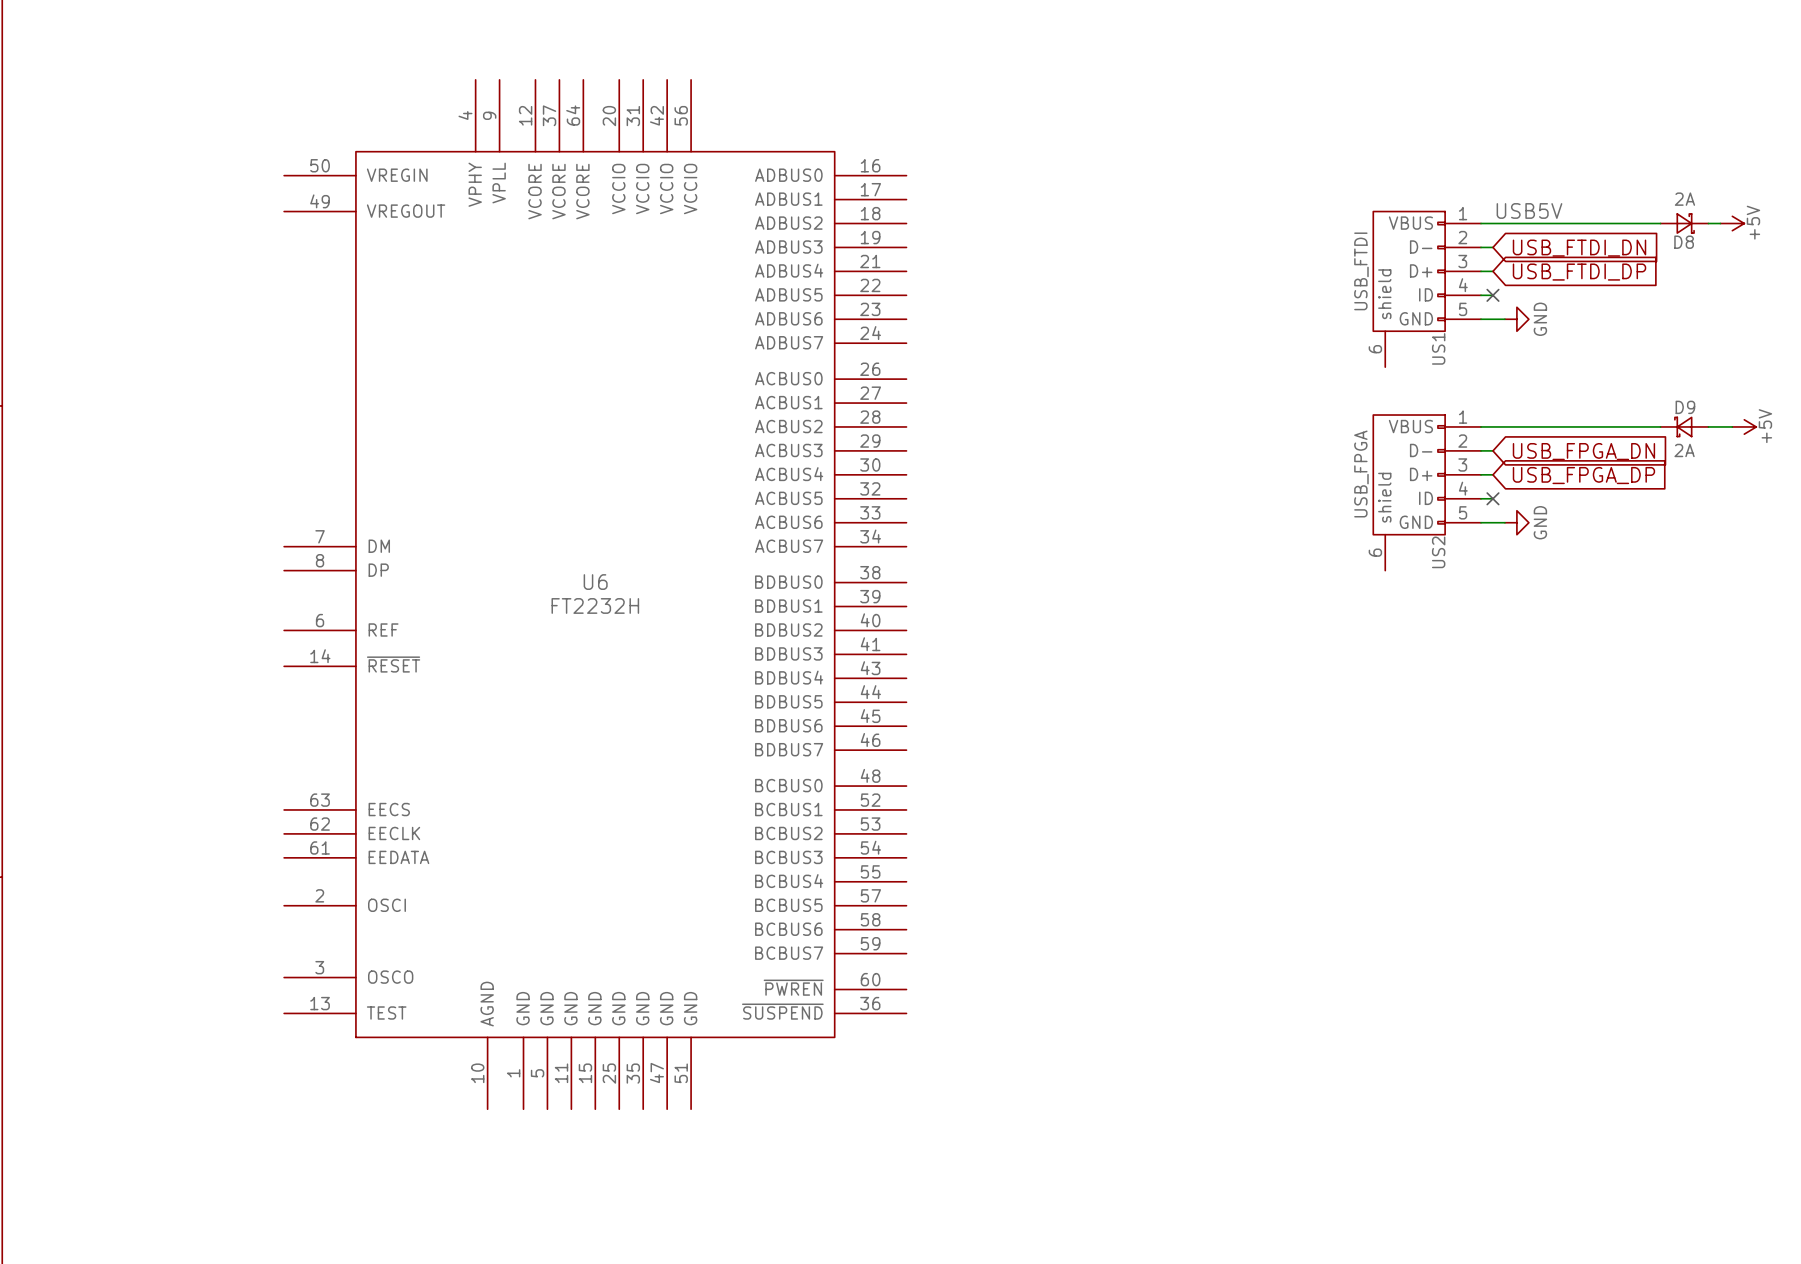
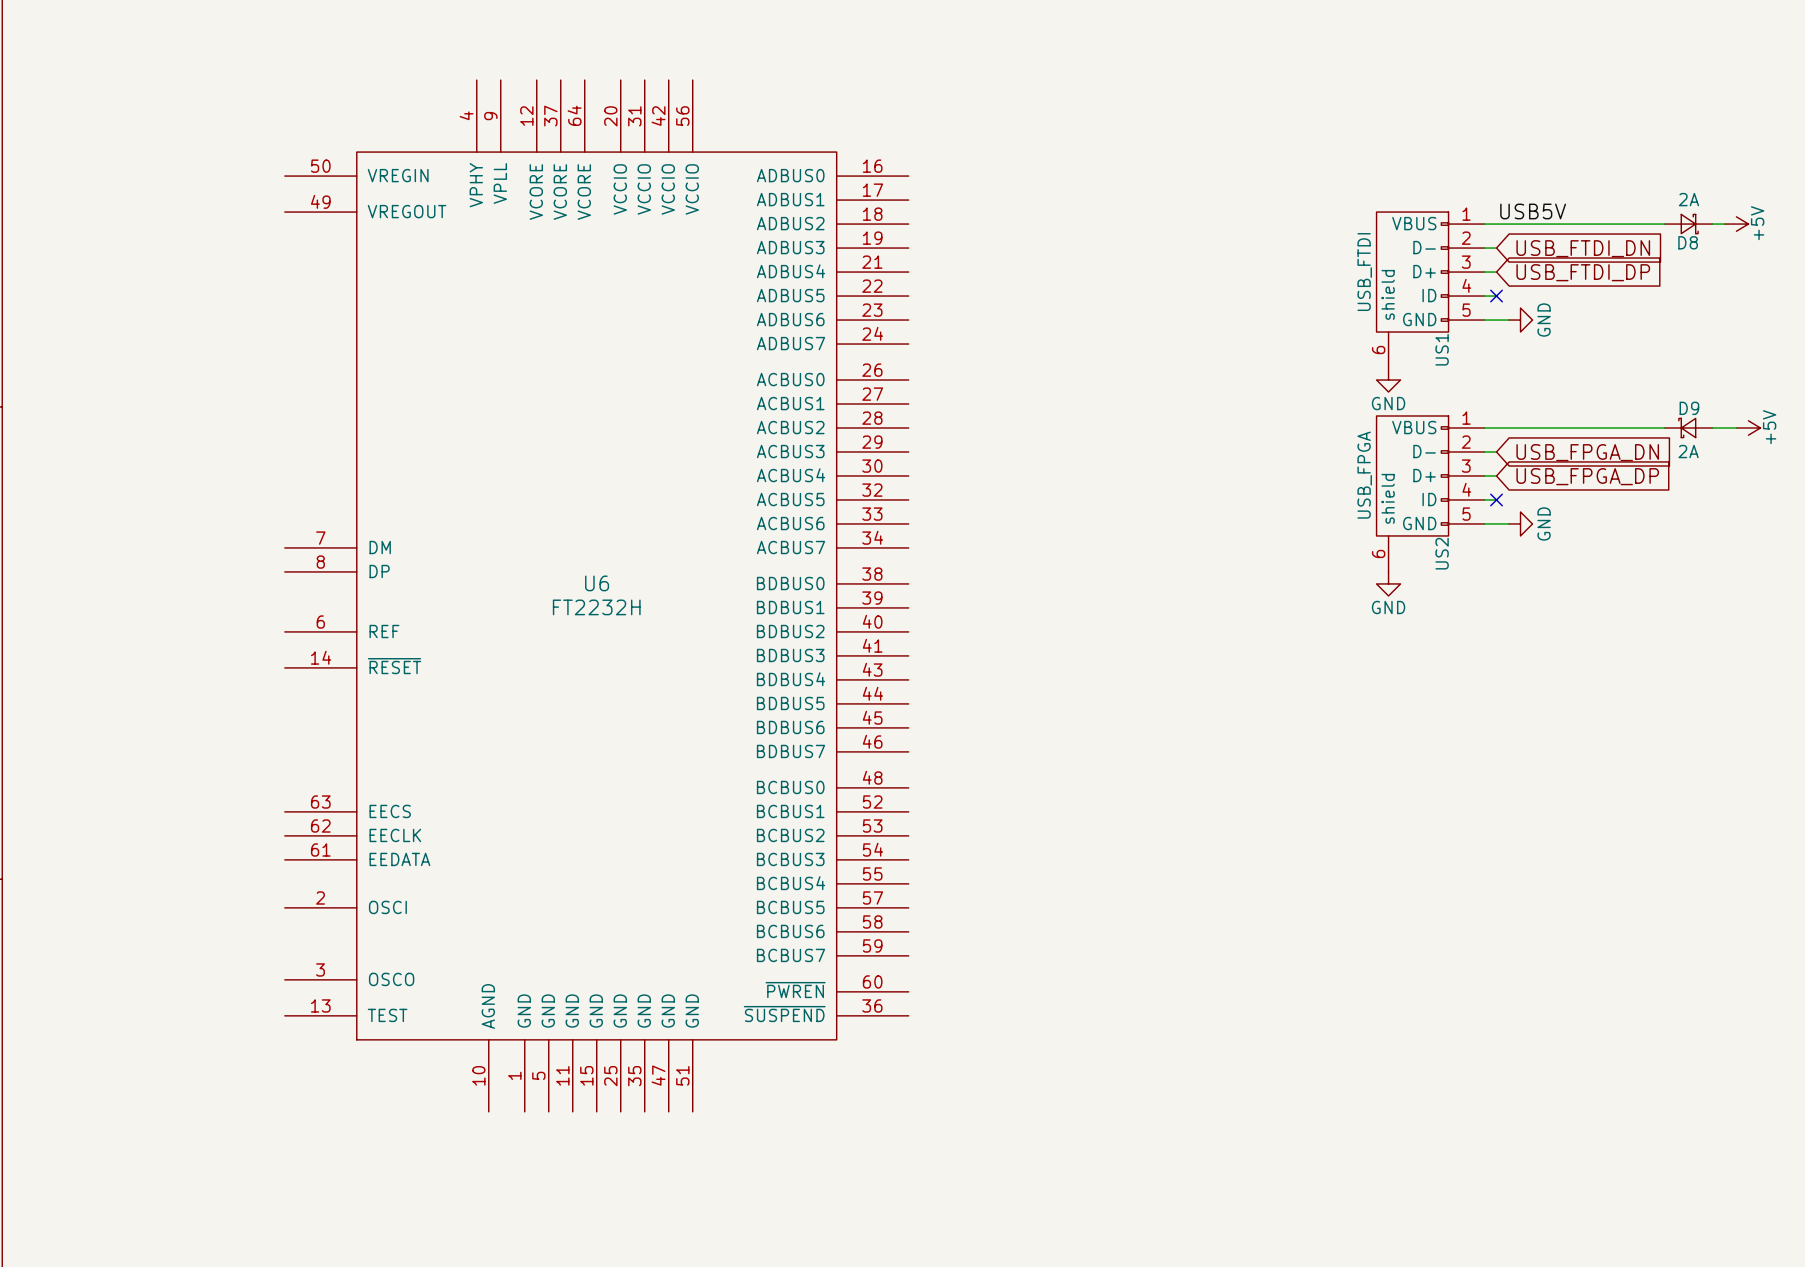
power symbol: none -> GND (1388, 380)
power symbol: none -> GND (1388, 583)

